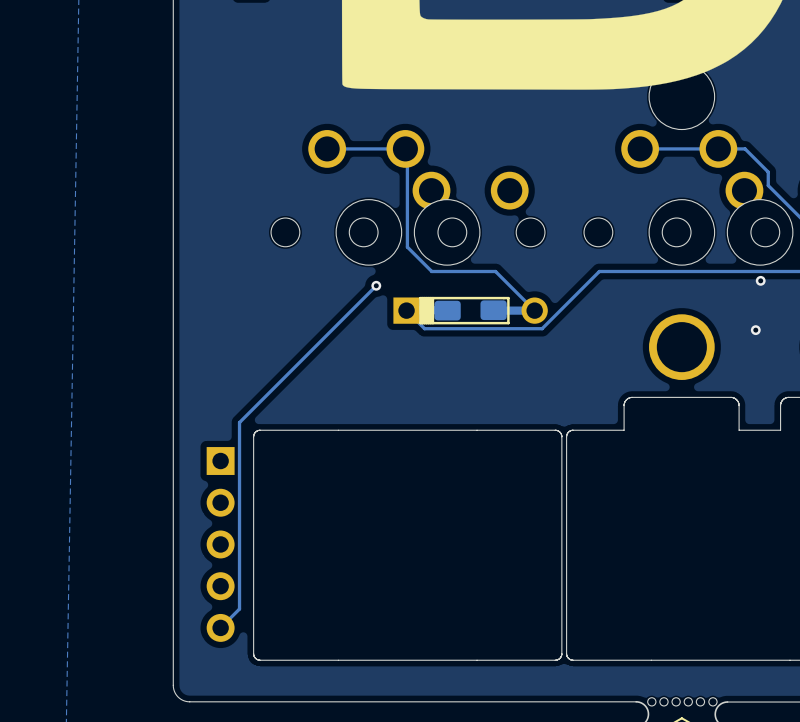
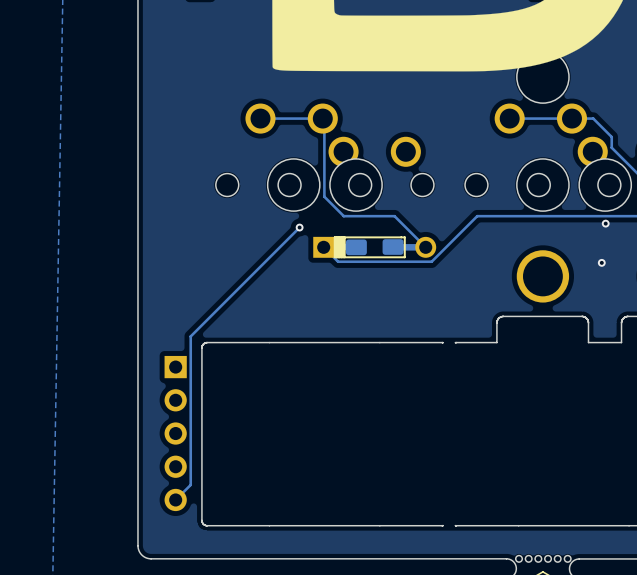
board edge: (561, 435) (561, 655) -> none
board edge: (566, 435) (566, 655) -> none

